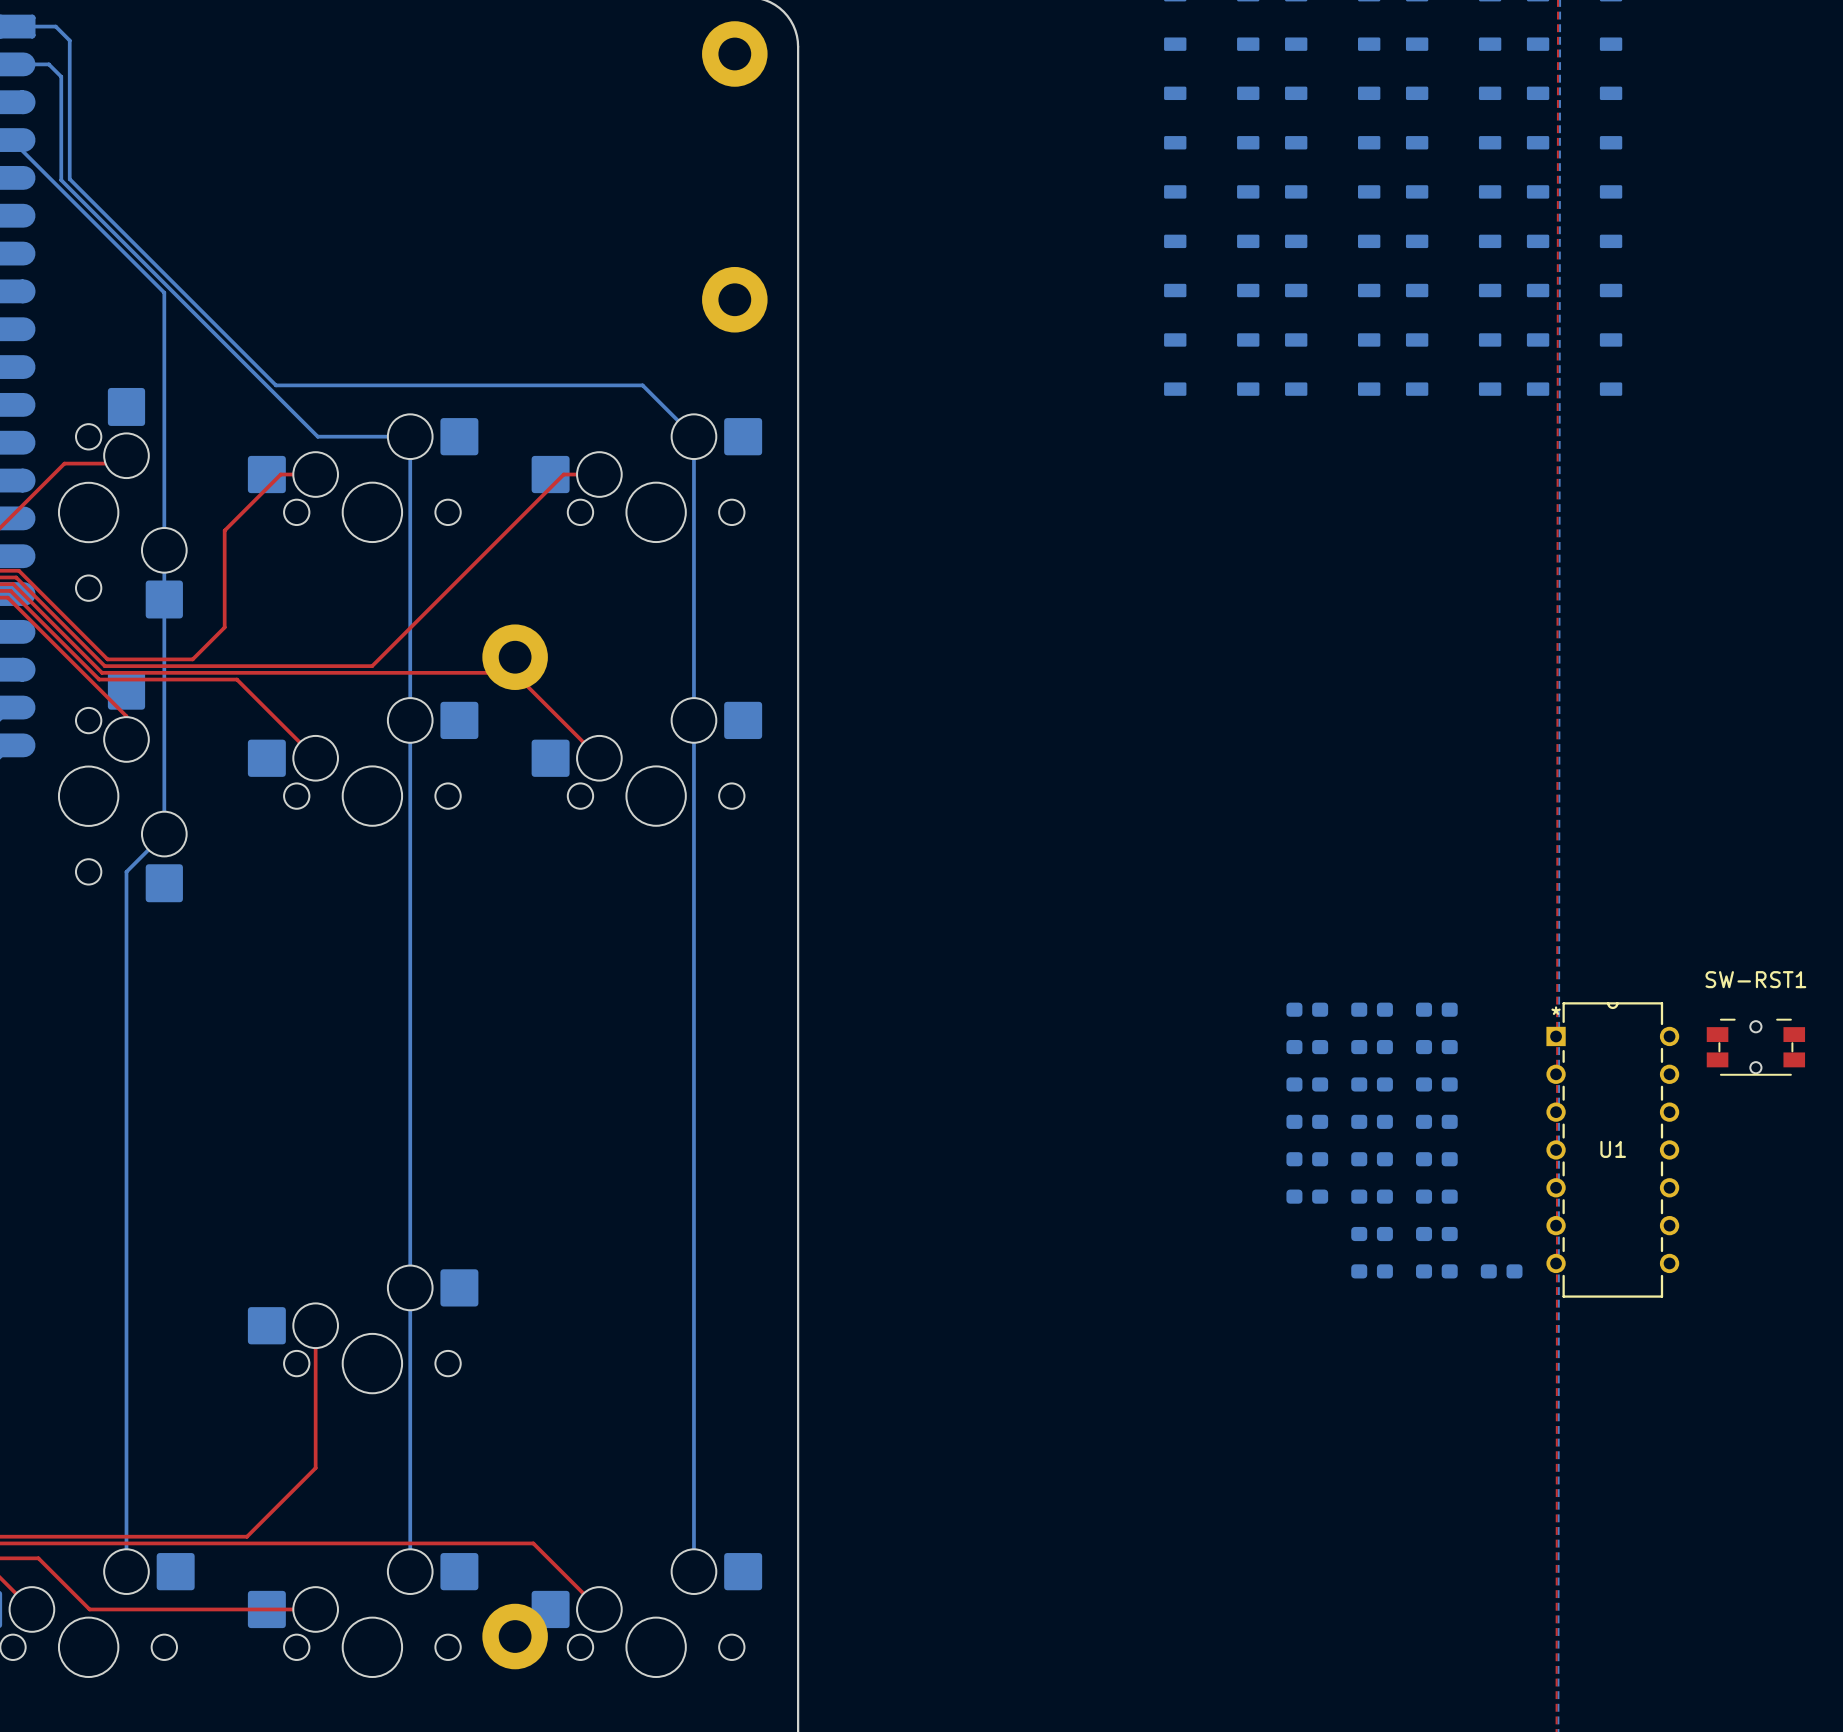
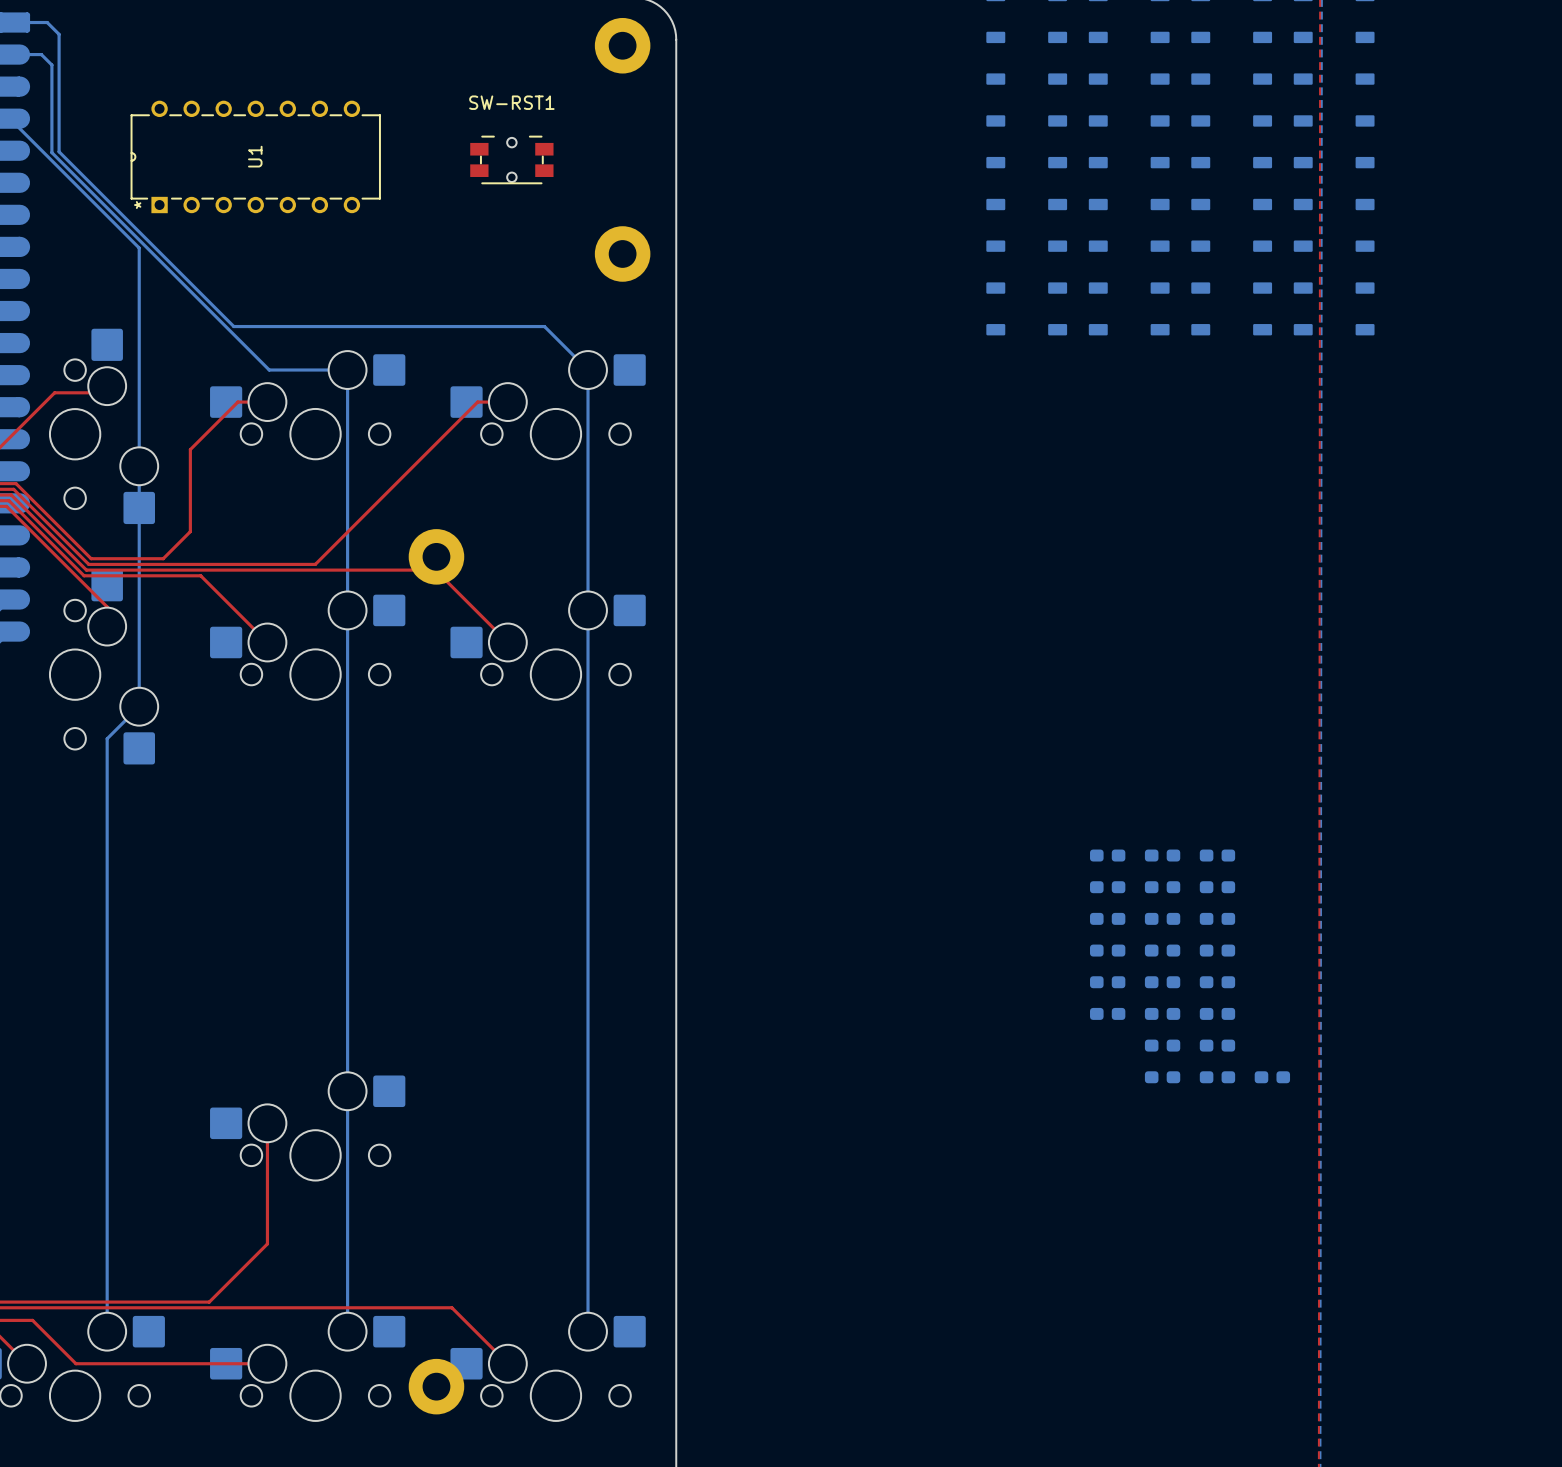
SW-RST1 position: (1755, 1047) -> (511, 159)
U1 rotation: 0° (1612, 1149) -> 90° counterclockwise (255, 156)
U1 position: (1612, 1149) -> (255, 156)

